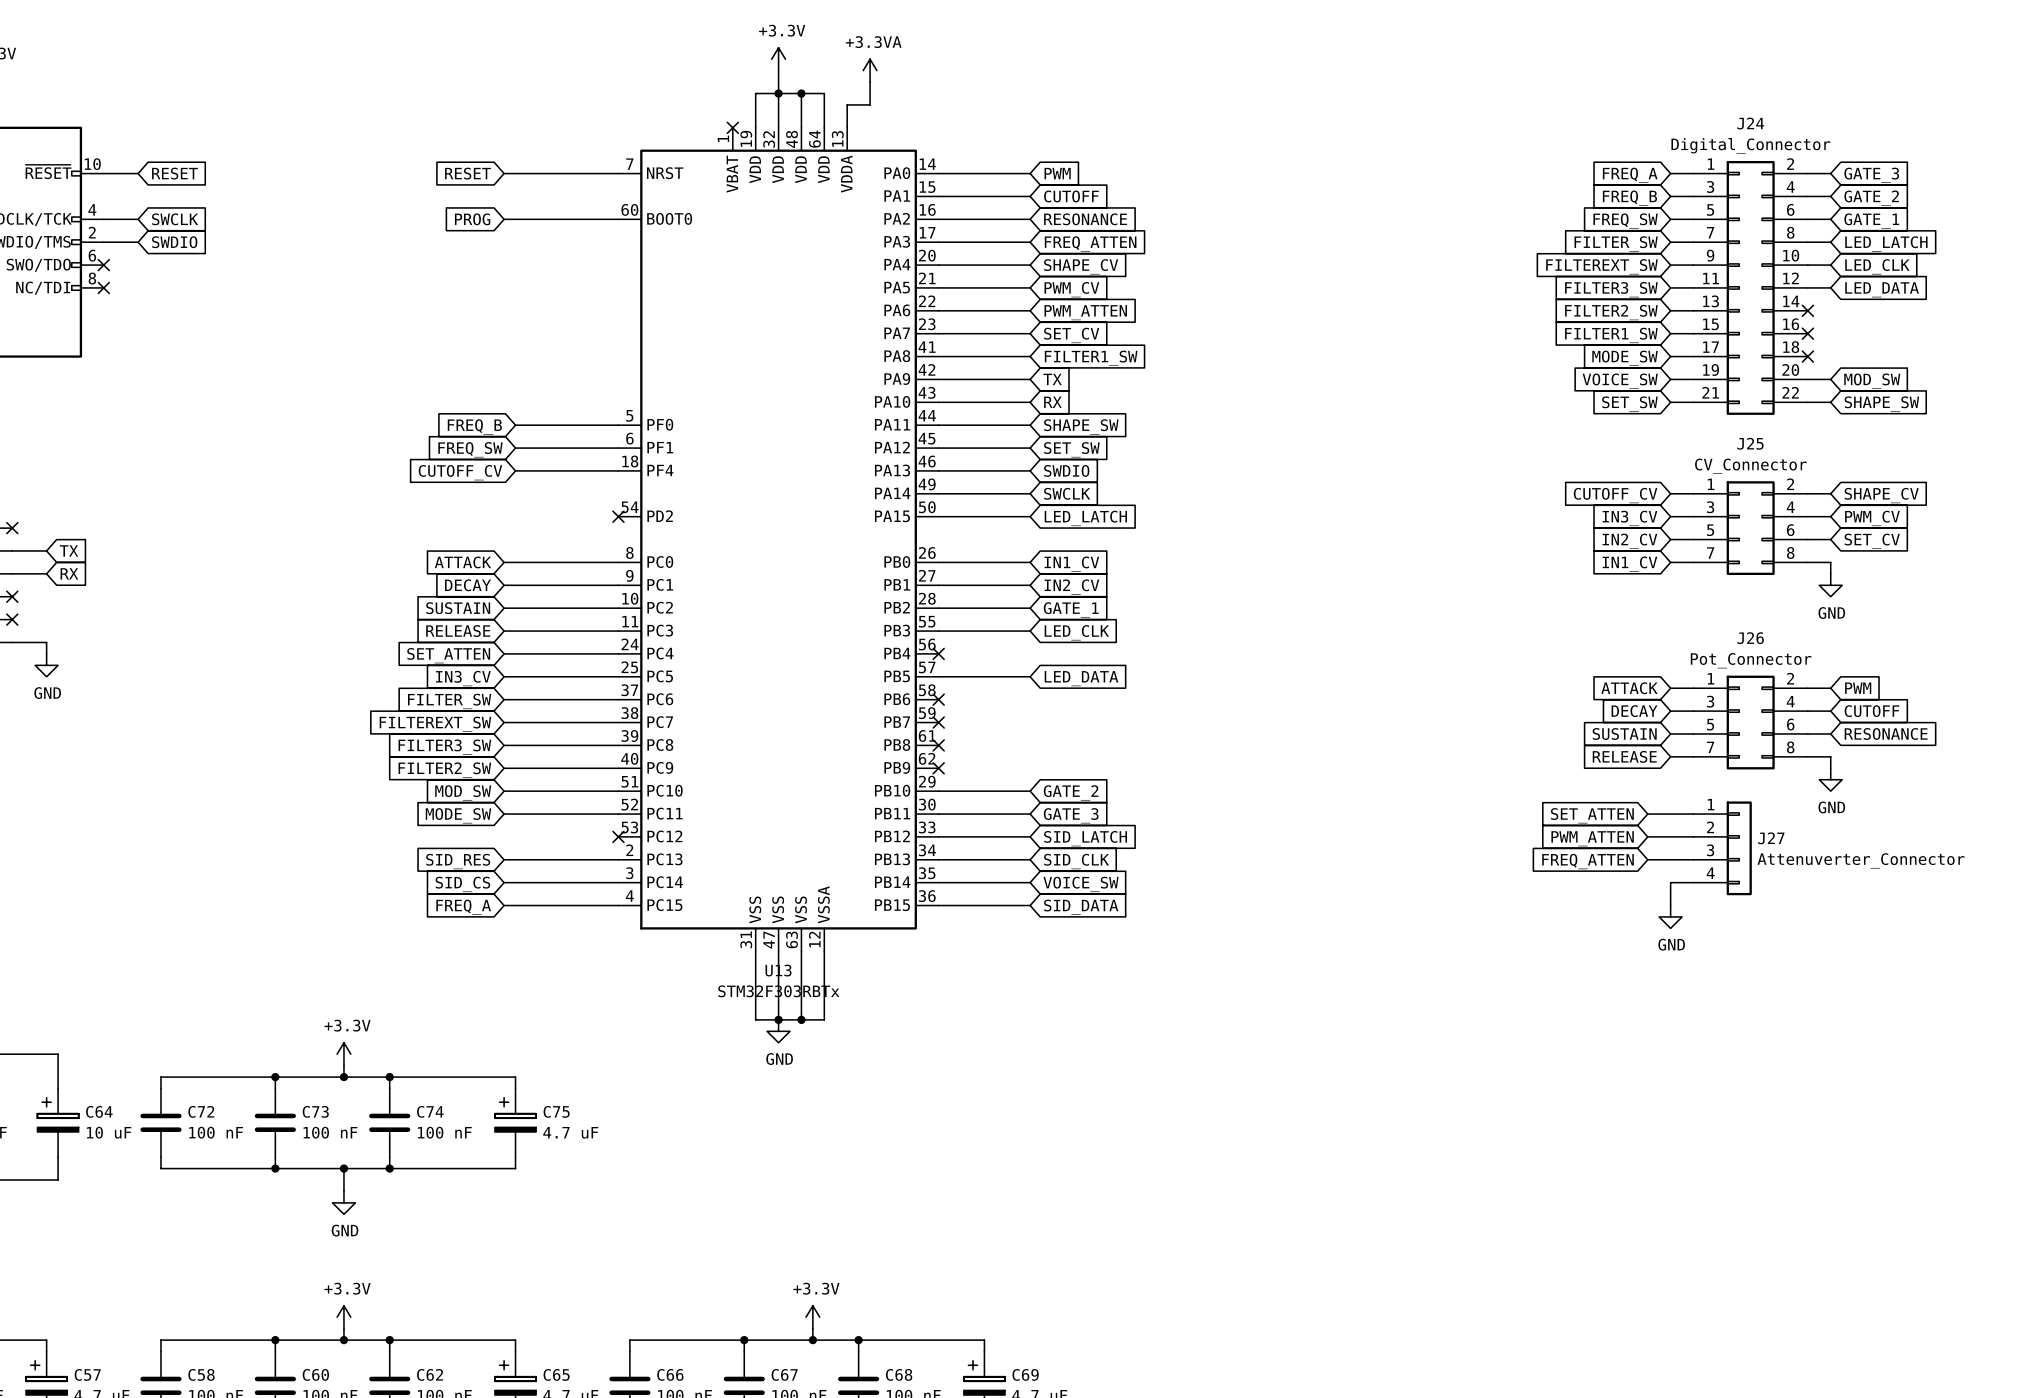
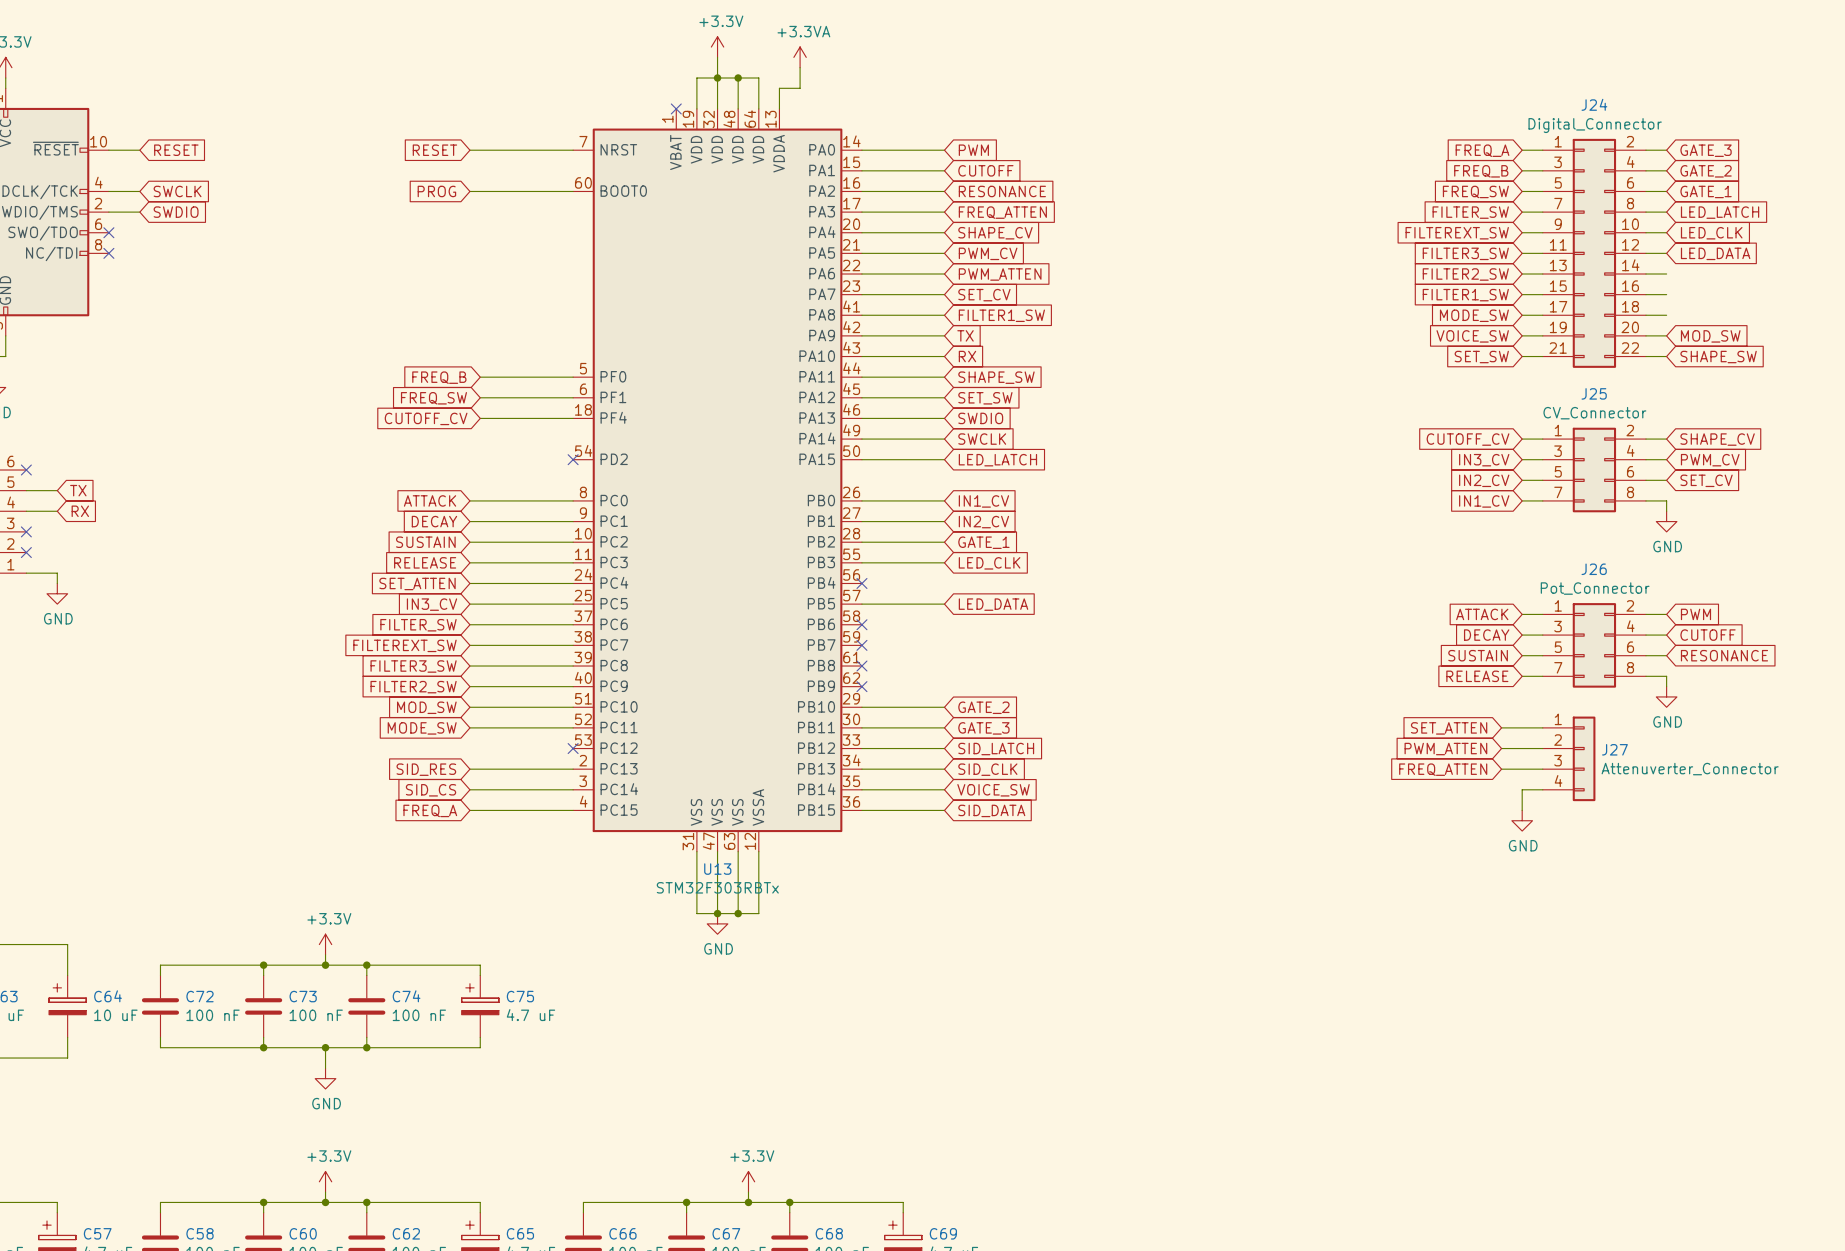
wire: none -> (1645, 274) (1666, 274)
no-connect mark: (1807, 310) -> none
wire: none -> (1645, 294) (1666, 294)
no-connect mark: (1807, 333) -> none
wire: none -> (1645, 315) (1666, 315)
no-connect mark: (1807, 356) -> none

